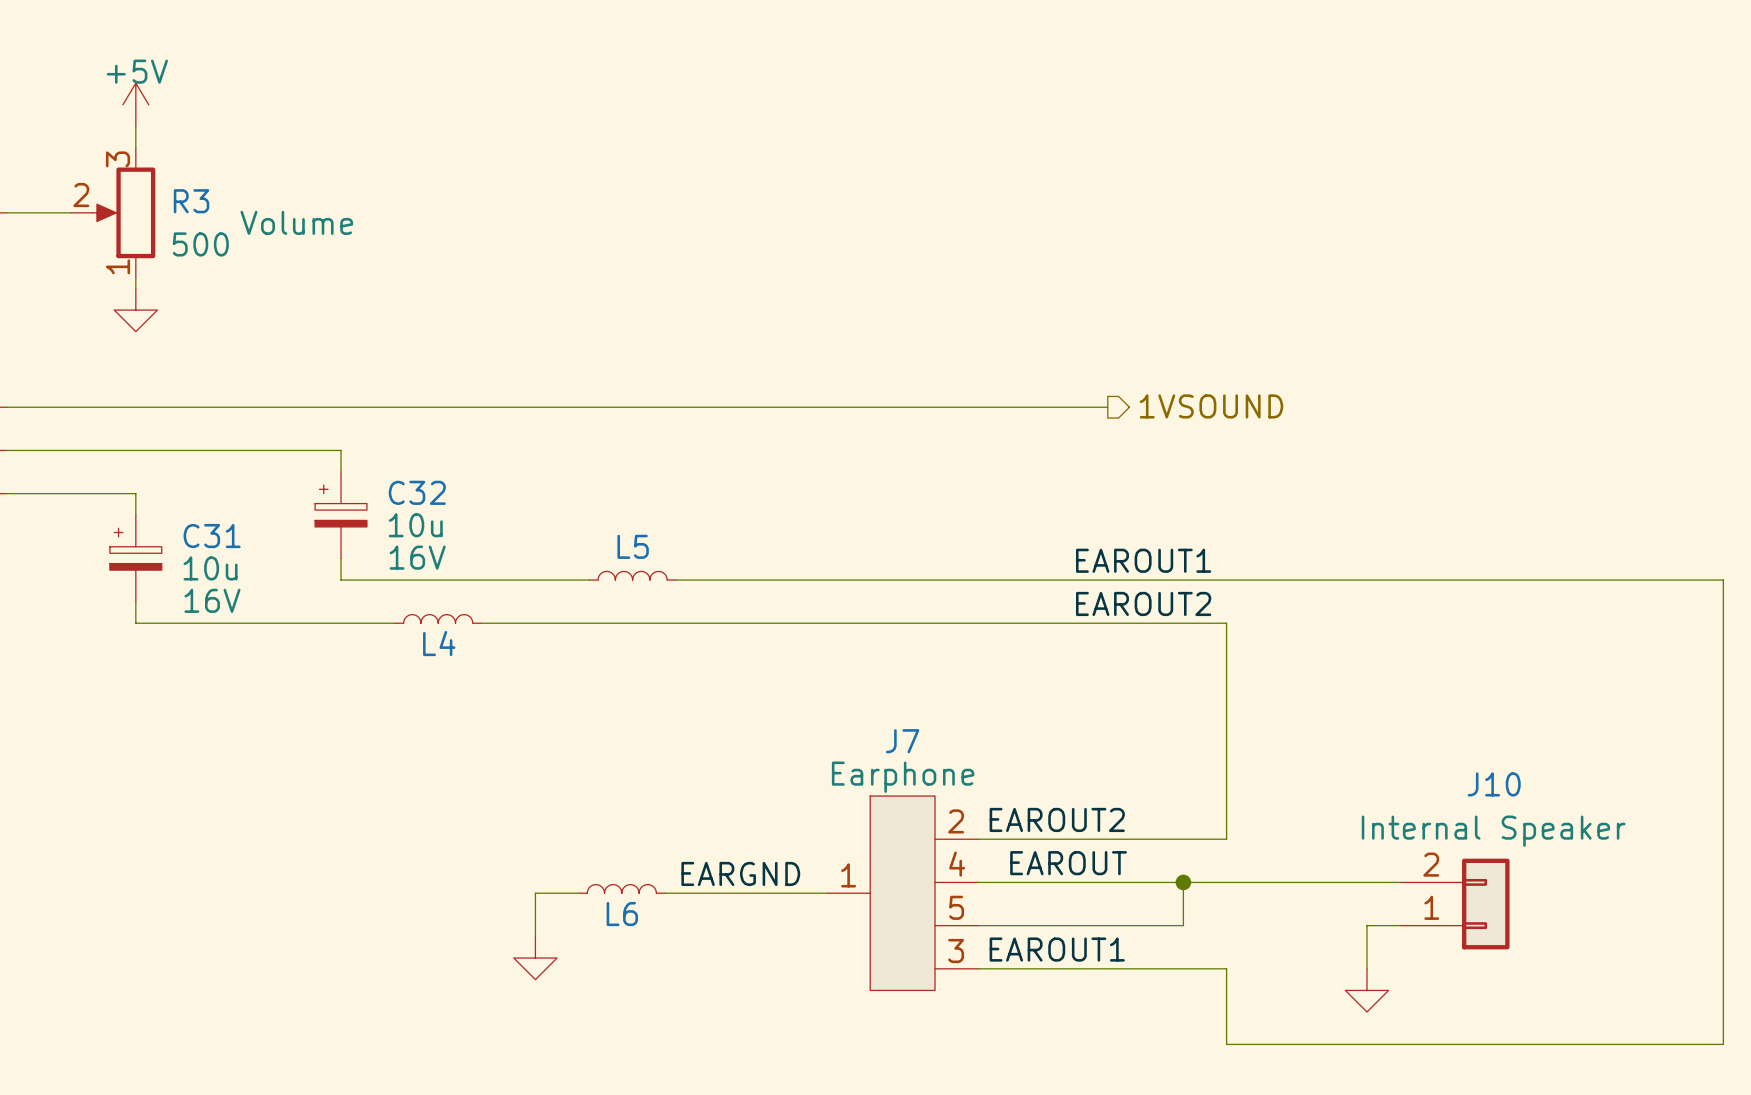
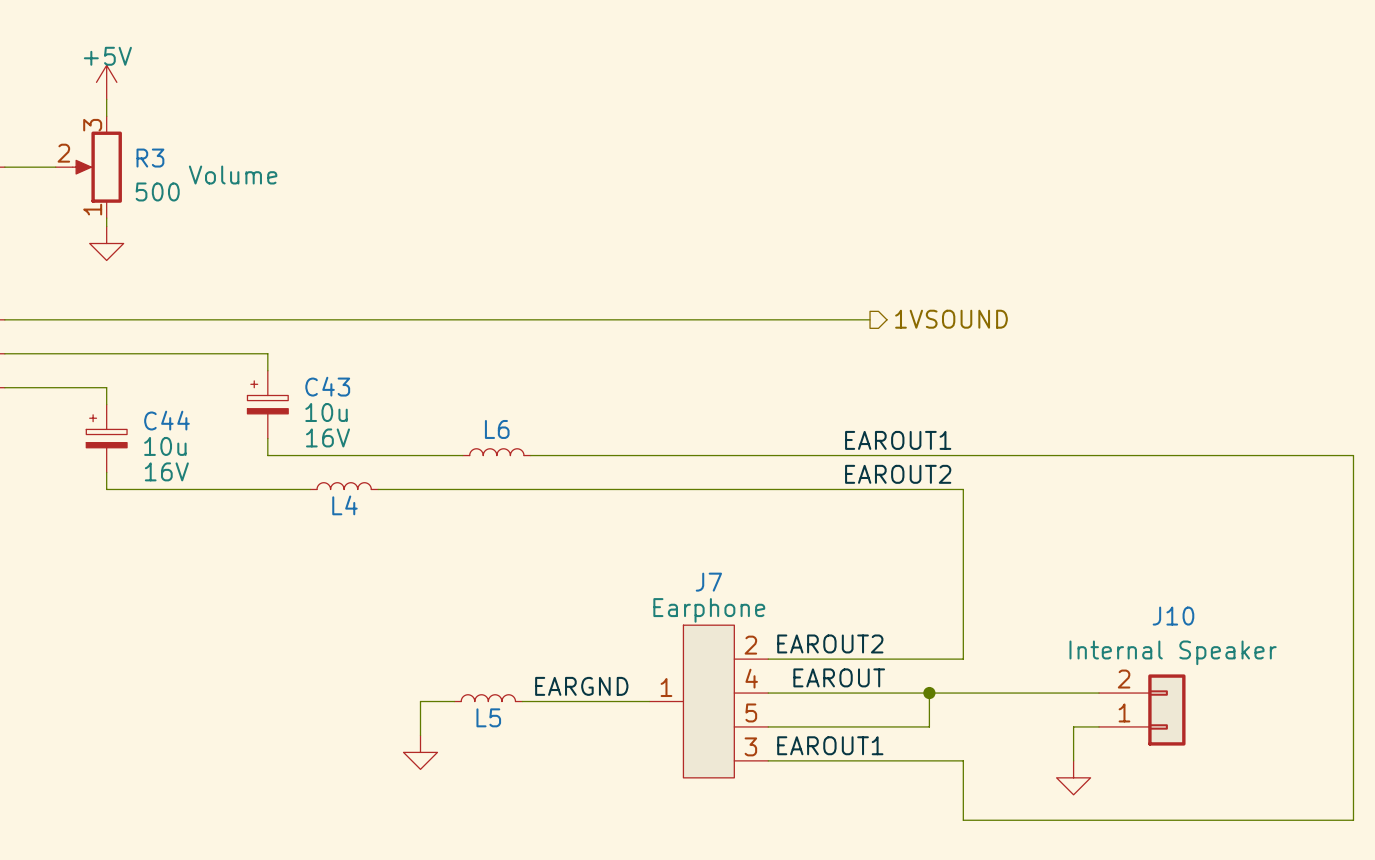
C32 name: C32 (417, 492) -> C43 (327, 386)
C31 name: C31 (212, 536) -> C44 (166, 420)
L5 name: L5 (633, 546) -> L6 (497, 429)
L6 name: L6 (622, 914) -> L5 (488, 717)

